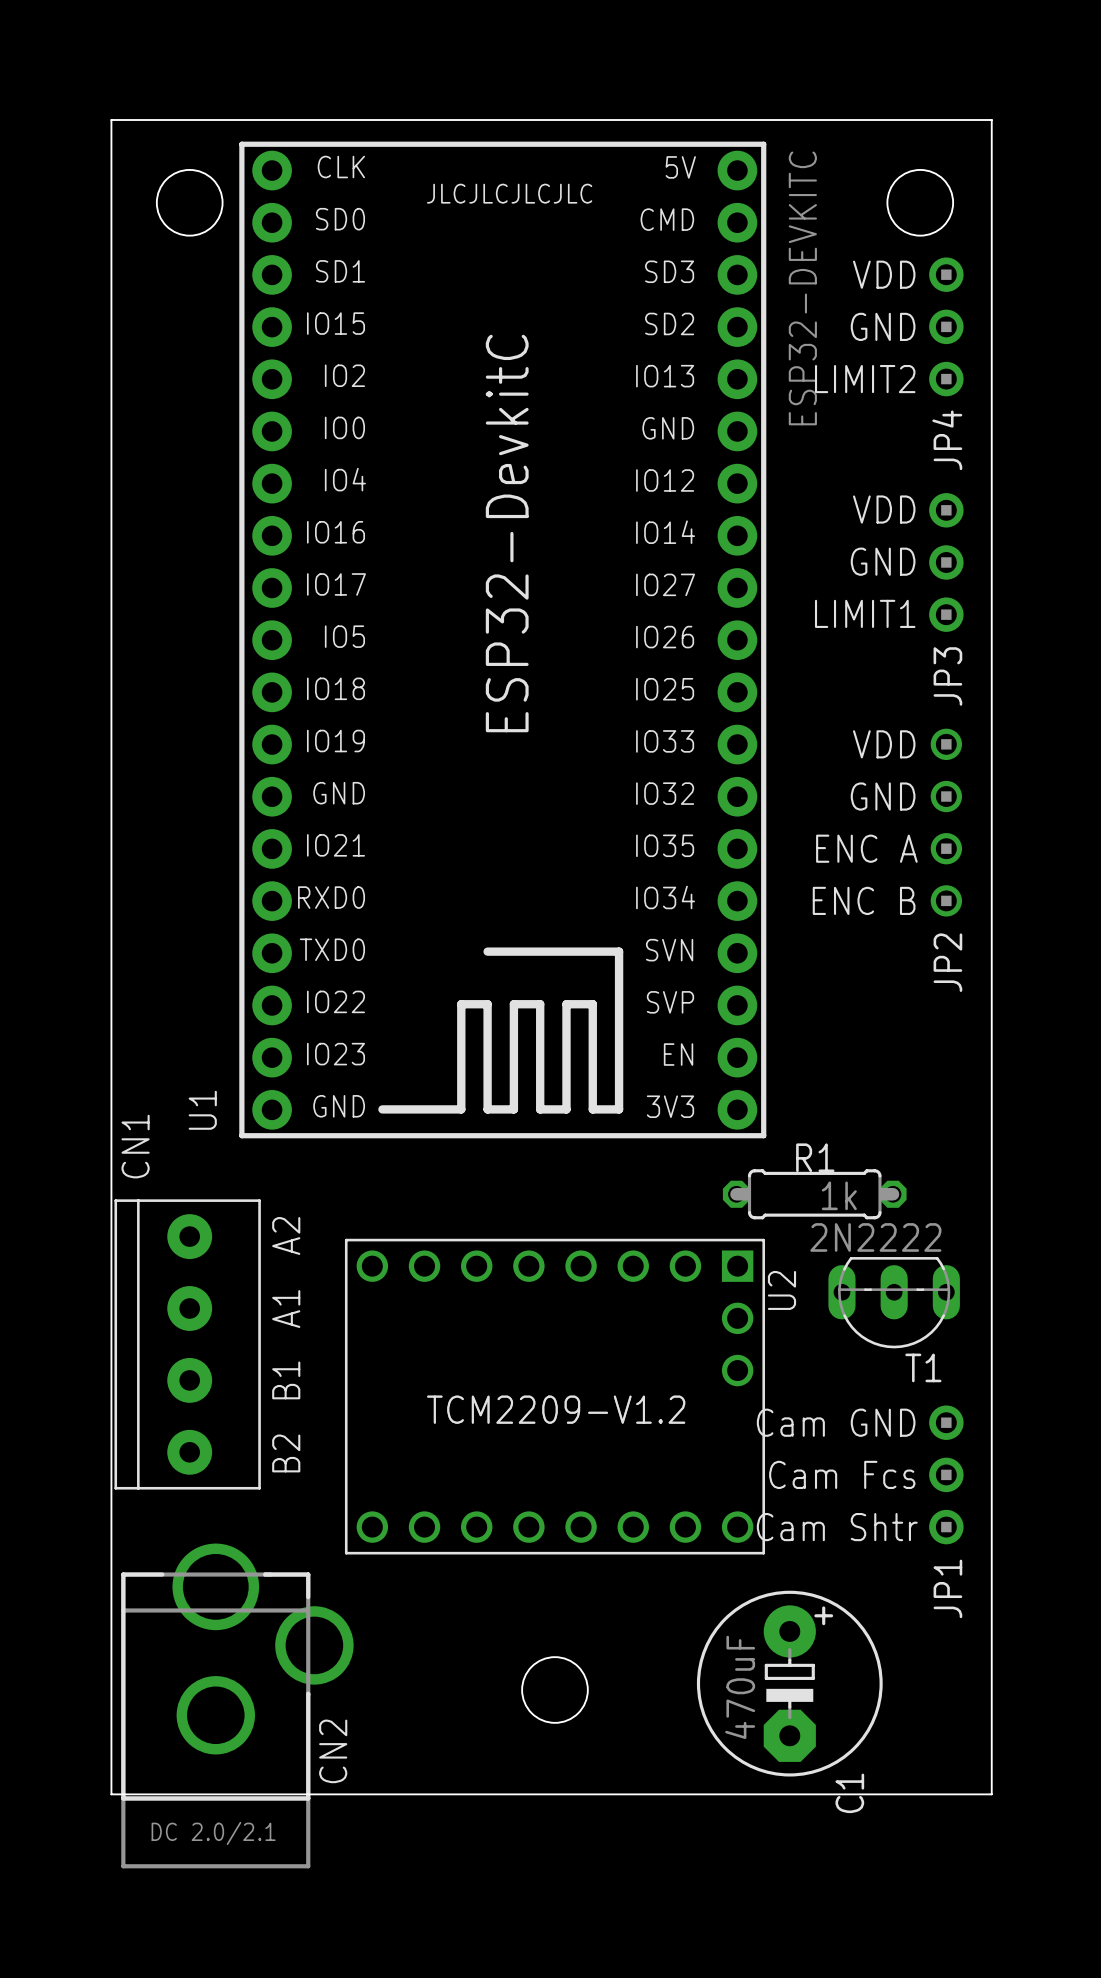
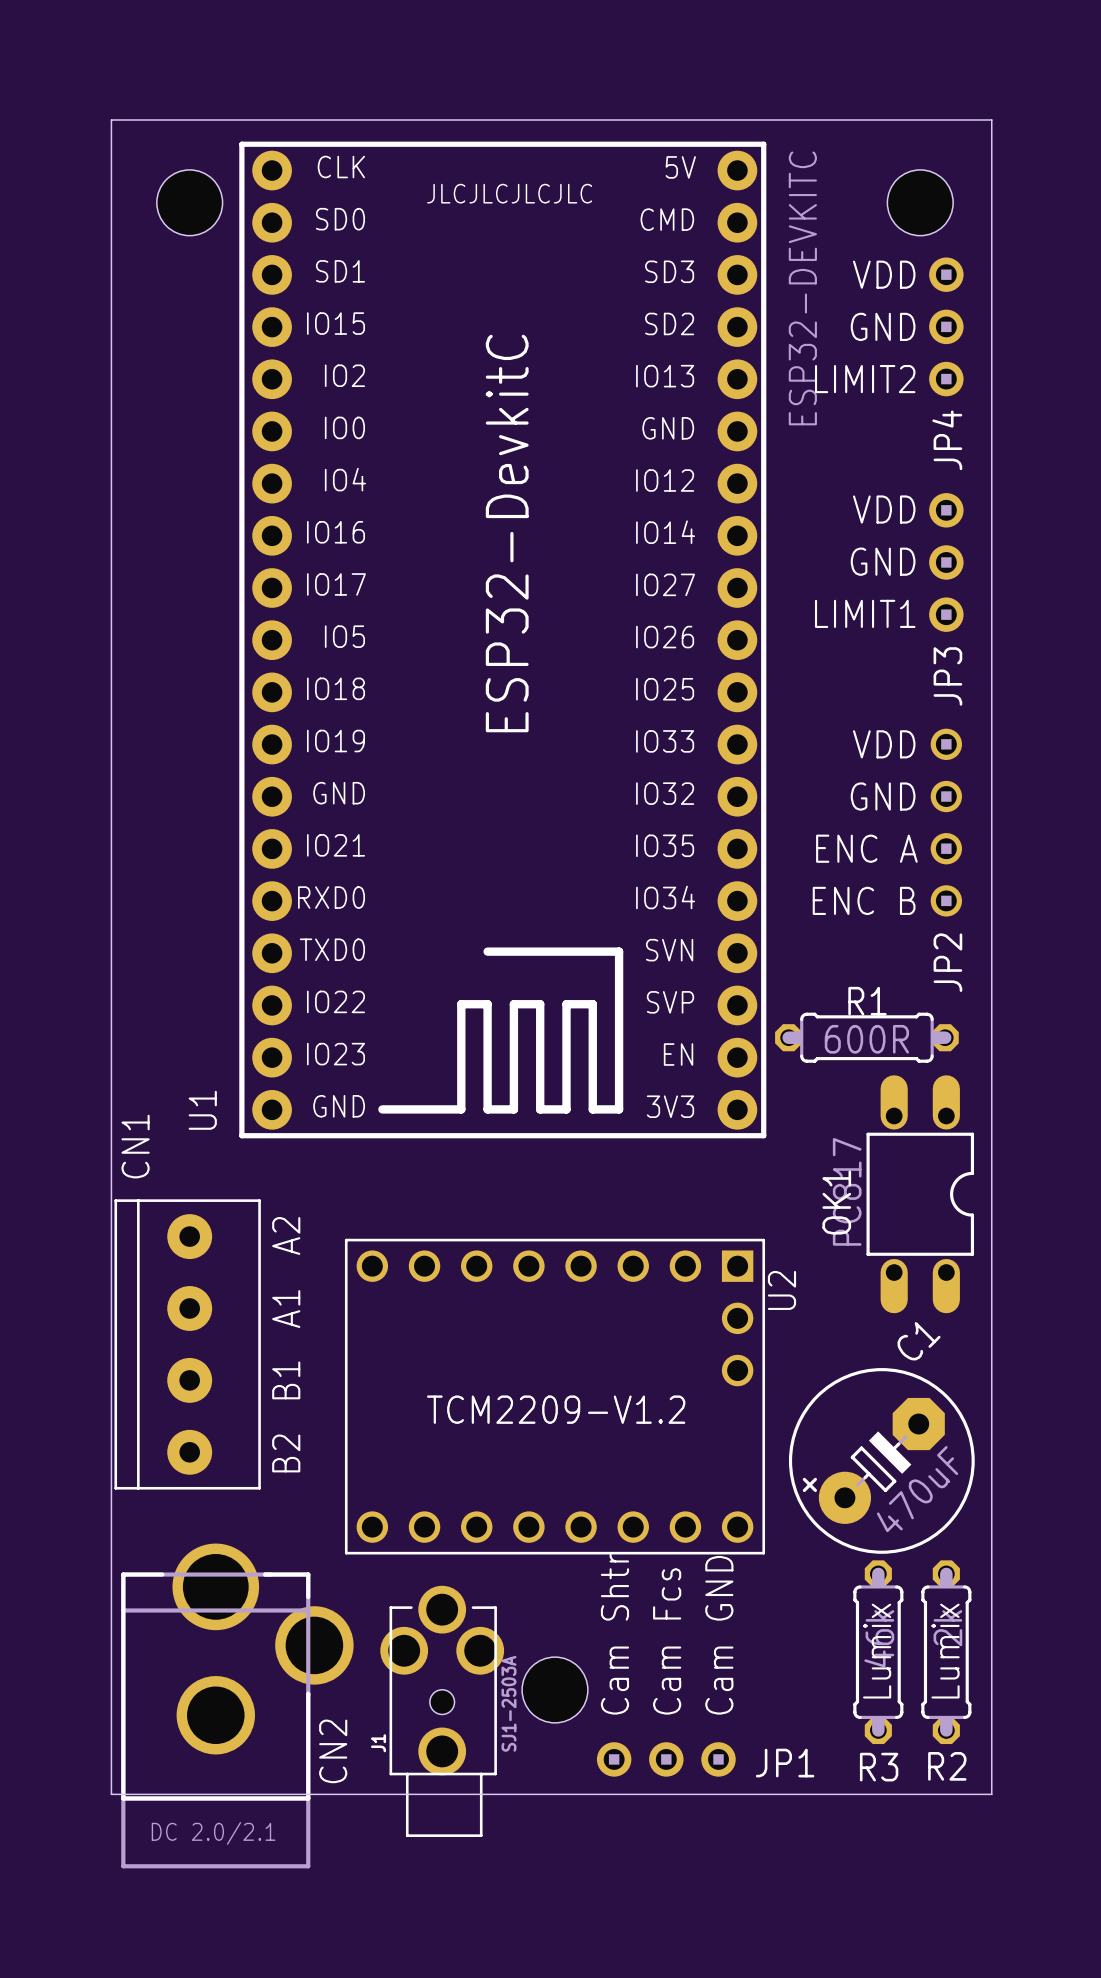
R1 position: (814, 1194) -> (866, 1037)
OK1: none -> PC817 (920, 1194)
R1 value: 1k (839, 1195) -> 600R (866, 1039)
T1: 2N2222 (894, 1302) -> none
text rotation: 0° (836, 1422) -> 90° counterclockwise (719, 1635)
text position: Cam GND (836, 1422) -> Cam GND (719, 1635)
text rotation: 0° (842, 1474) -> 90° counterclockwise (667, 1641)
text position: Cam Fcs (842, 1474) -> Cam Fcs (667, 1641)
JP1 rotation: 0° (946, 1474) -> 90° clockwise (666, 1759)
JP1 position: (946, 1474) -> (666, 1759)
text rotation: 0° (837, 1527) -> 90° counterclockwise (614, 1634)
text position: Cam Shtr (837, 1527) -> Cam Shtr (614, 1634)
JP1 name position: JP1 (947, 1588) -> JP1 (785, 1763)
text: none -> Lumix (877, 1651)
text: none -> Lumix (945, 1651)
R3: none -> 46k (878, 1652)
R2: none -> 2k (946, 1652)
C1 rotation: 0° (789, 1683) -> 135° counterclockwise (881, 1460)
C1 position: (789, 1683) -> (881, 1460)
J1: none -> SJ1-2503A (442, 1711)

